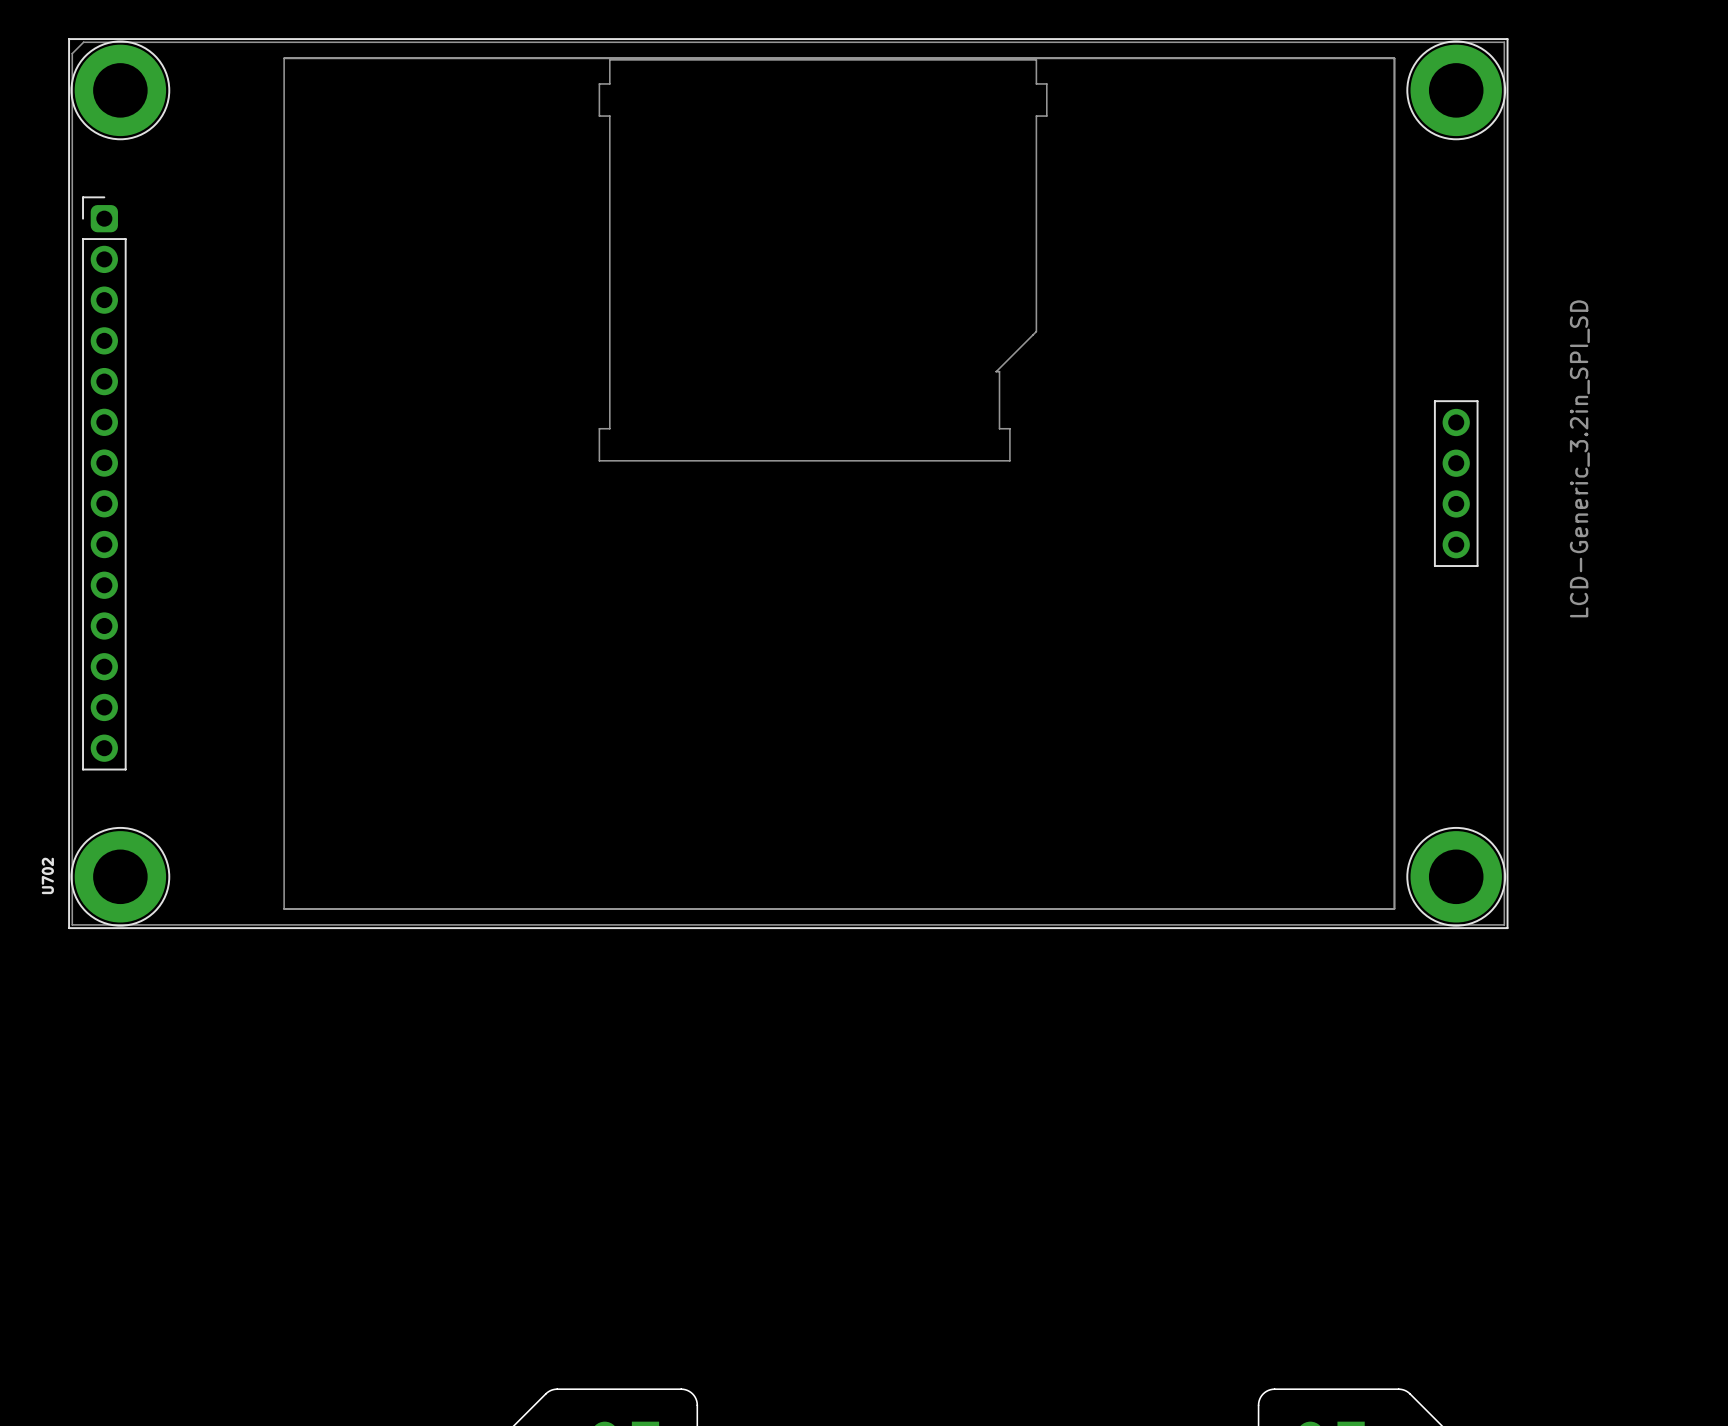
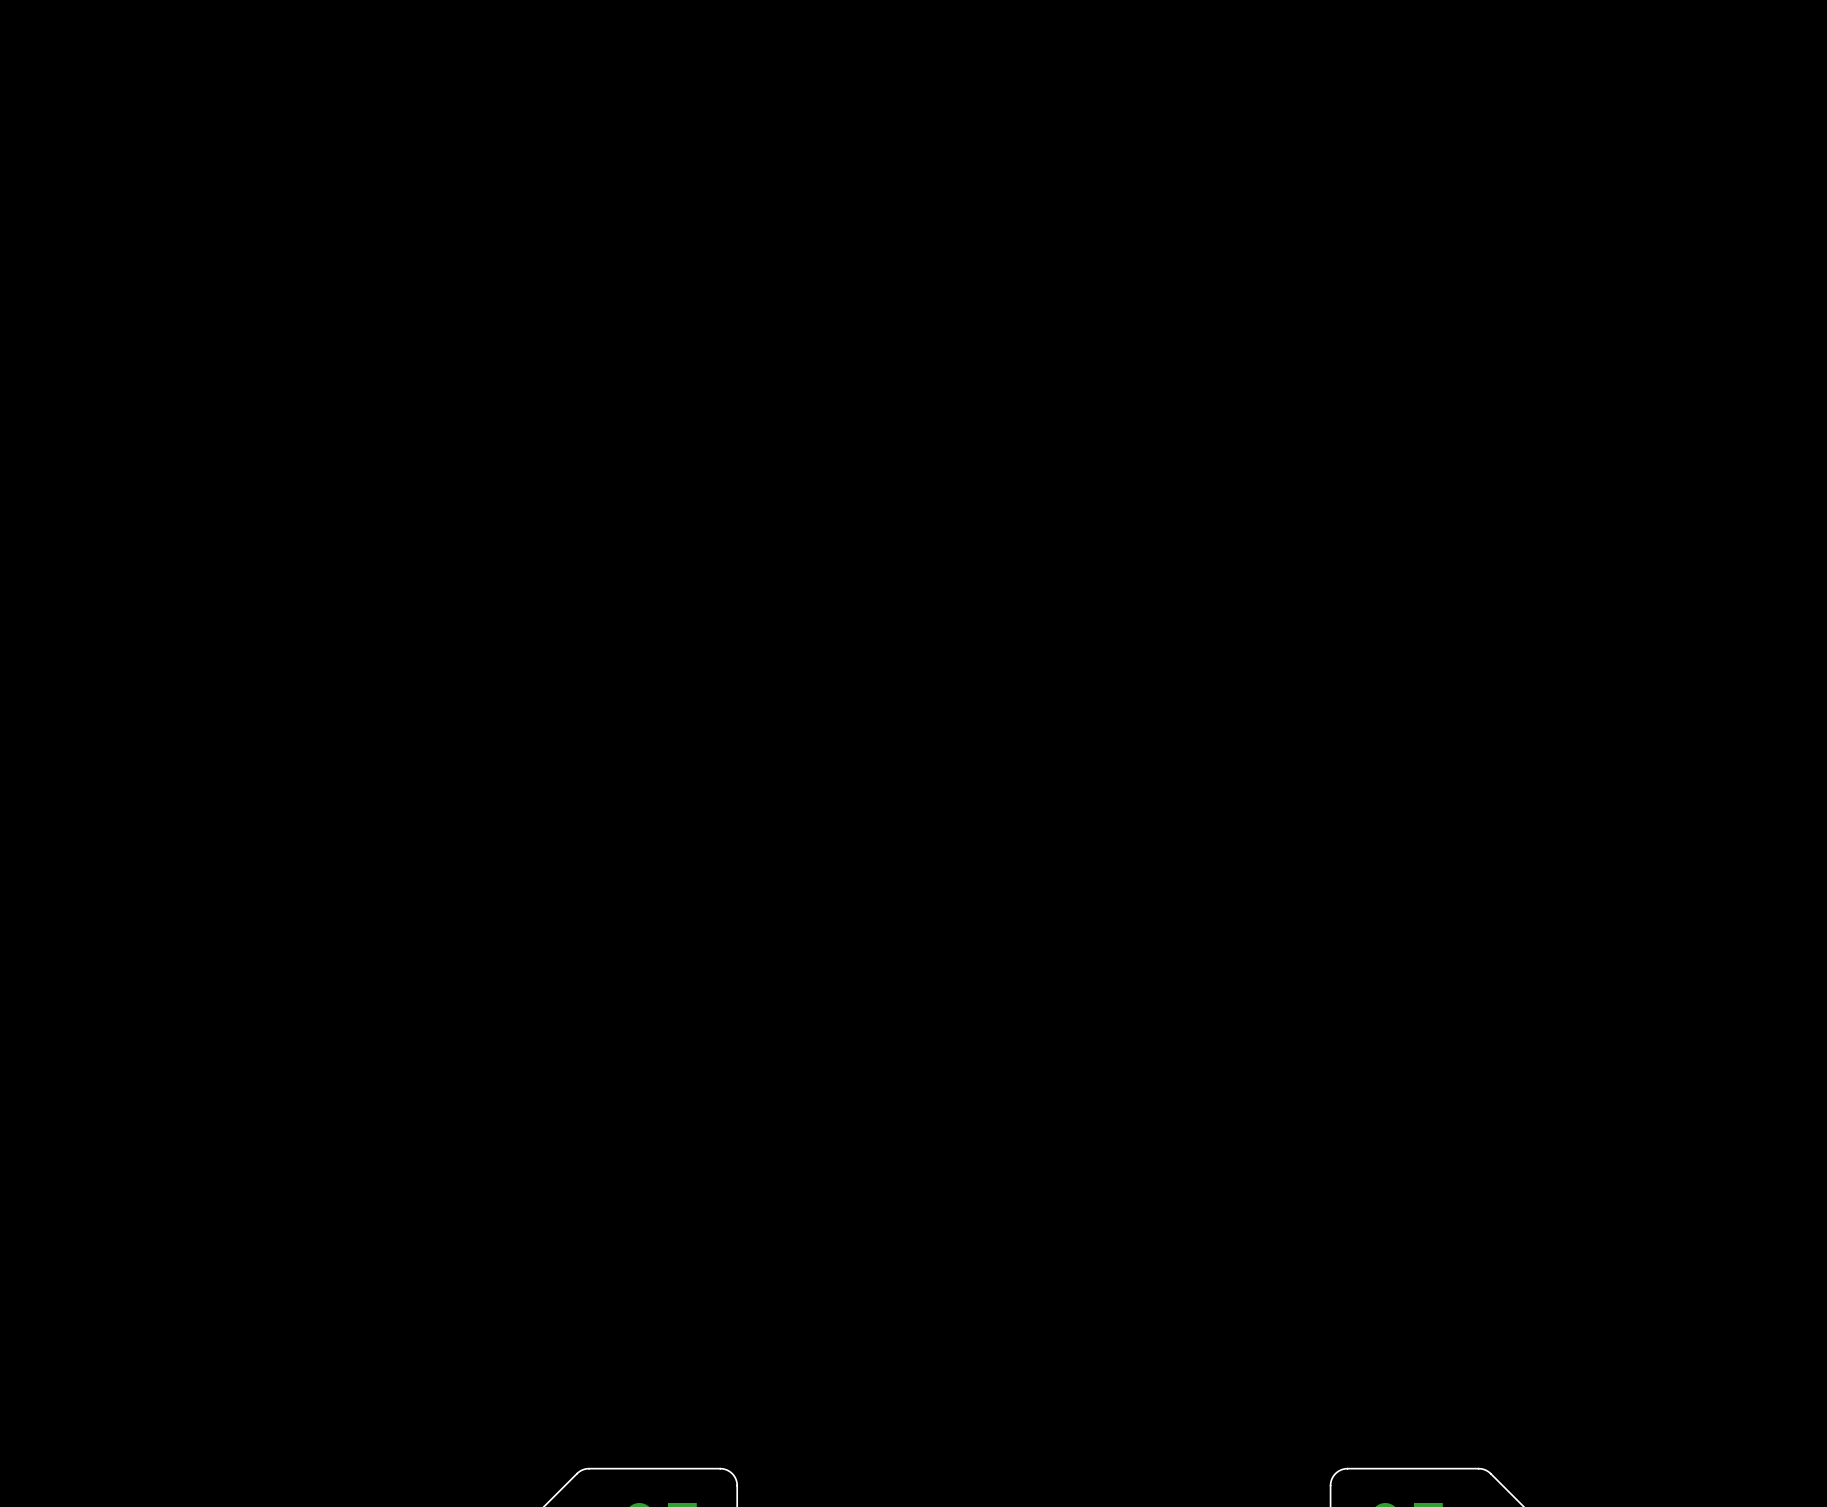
U702: LCD-Generic_3.2in_SPI_SD (788, 483) -> none

